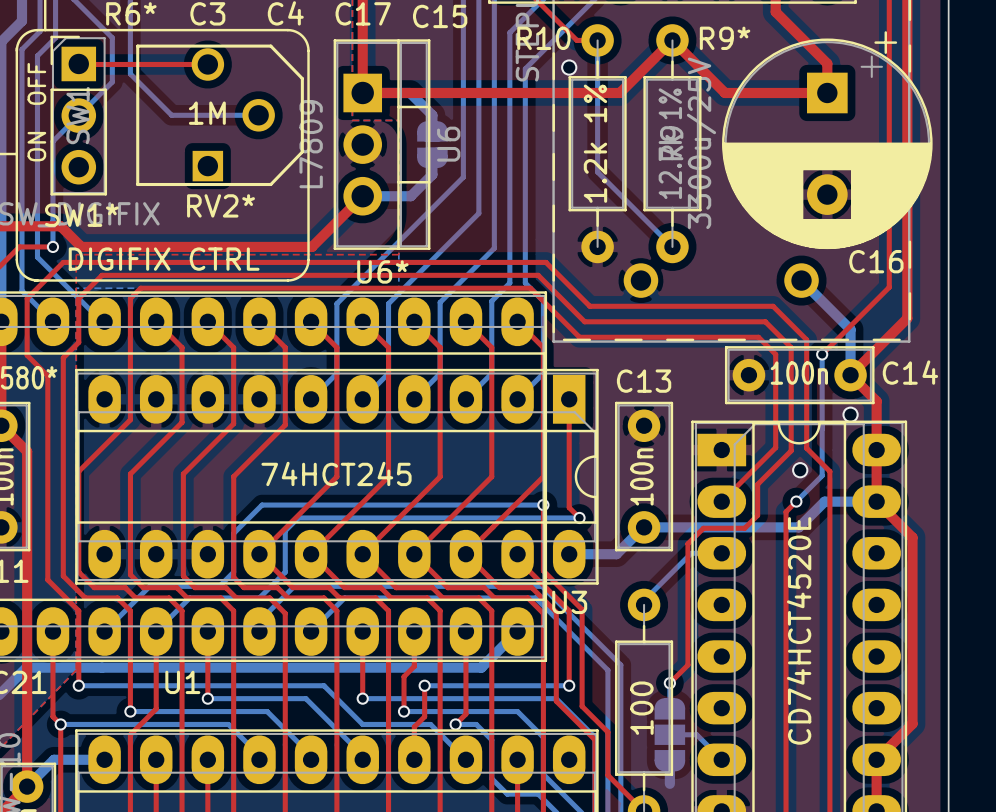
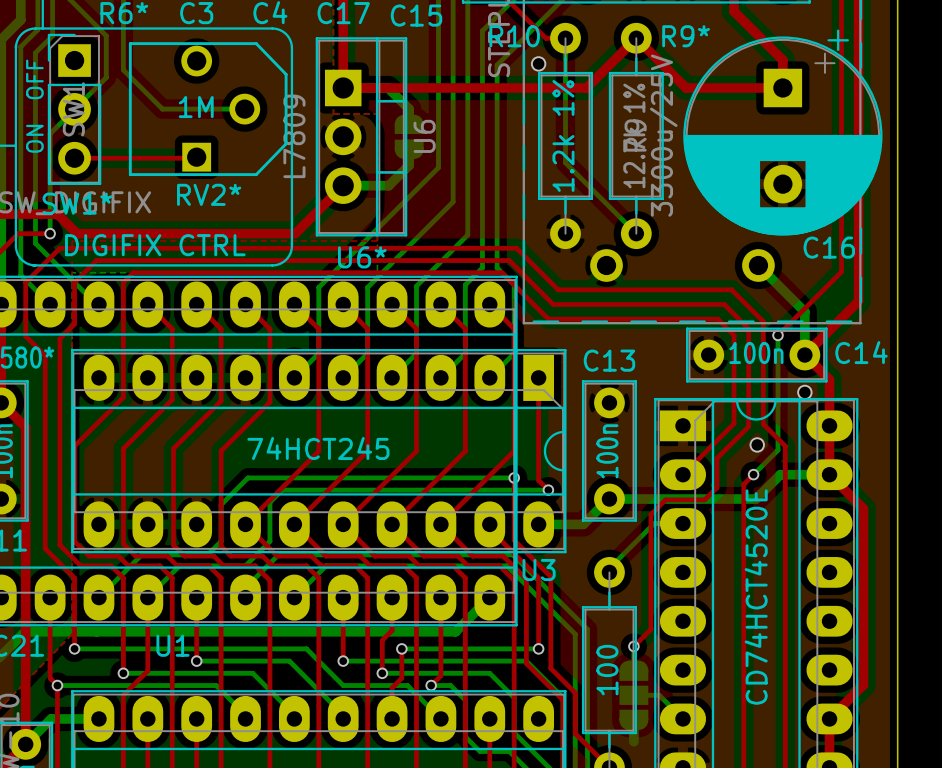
top track: (78, 63) (207, 64) -> none
top track: none -> (74, 158) (195, 158)

